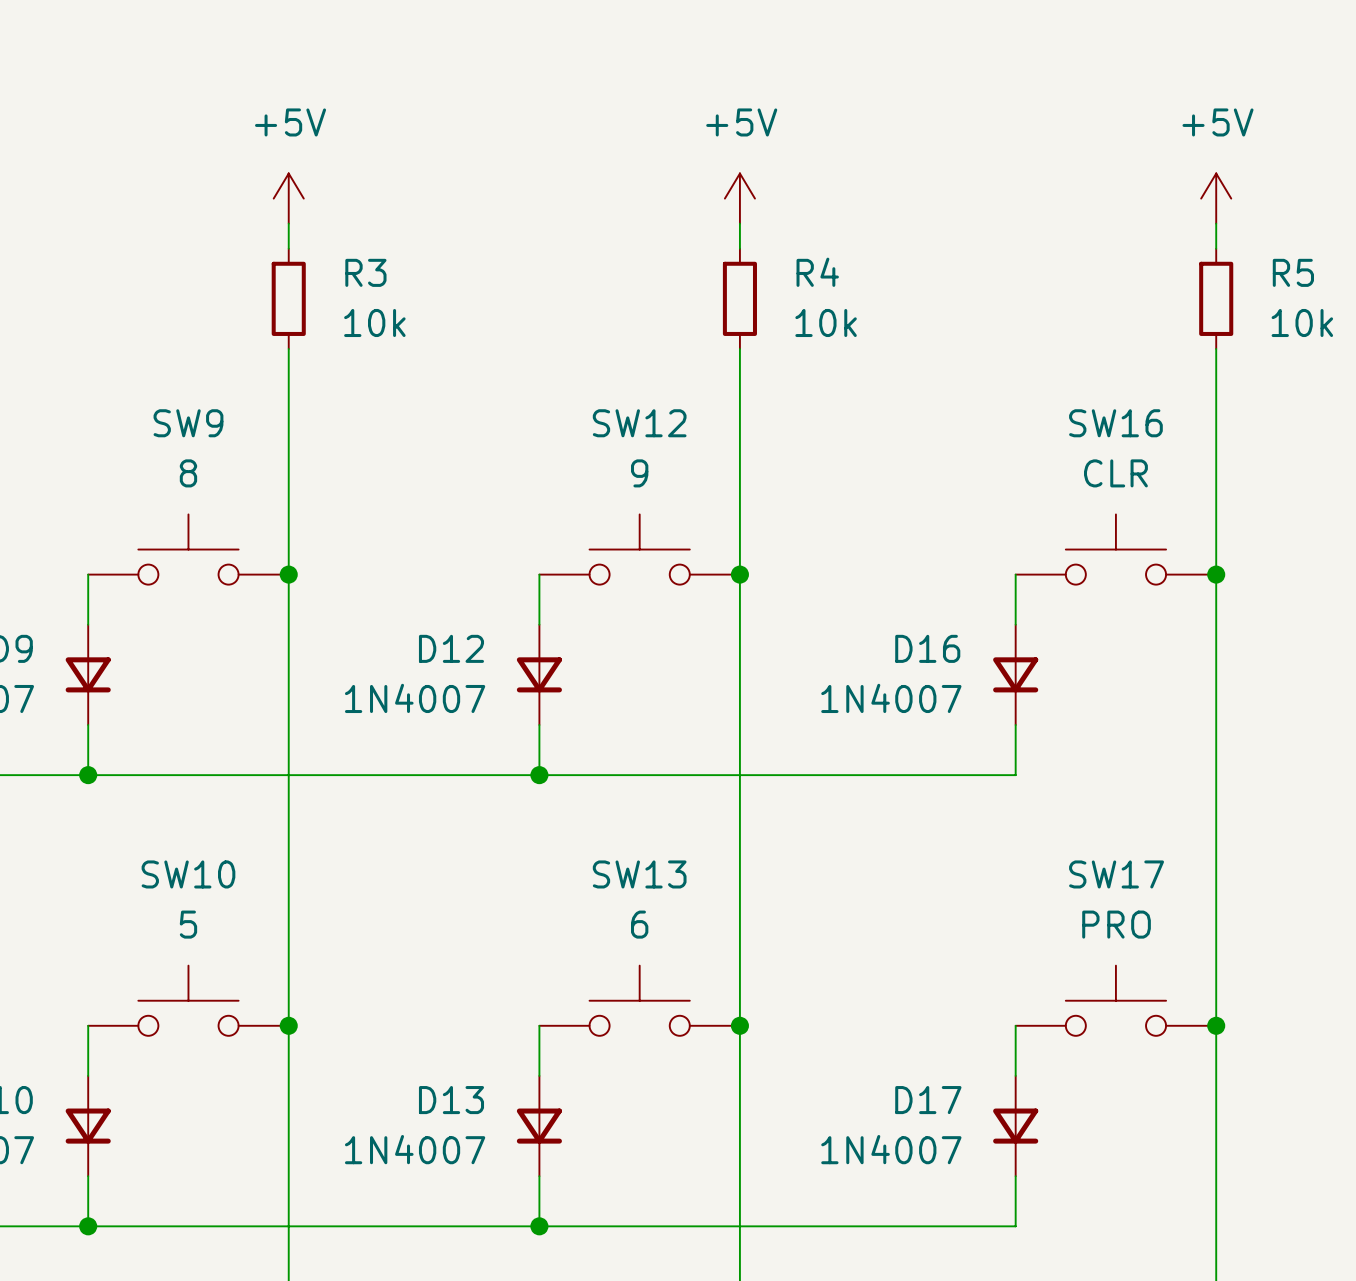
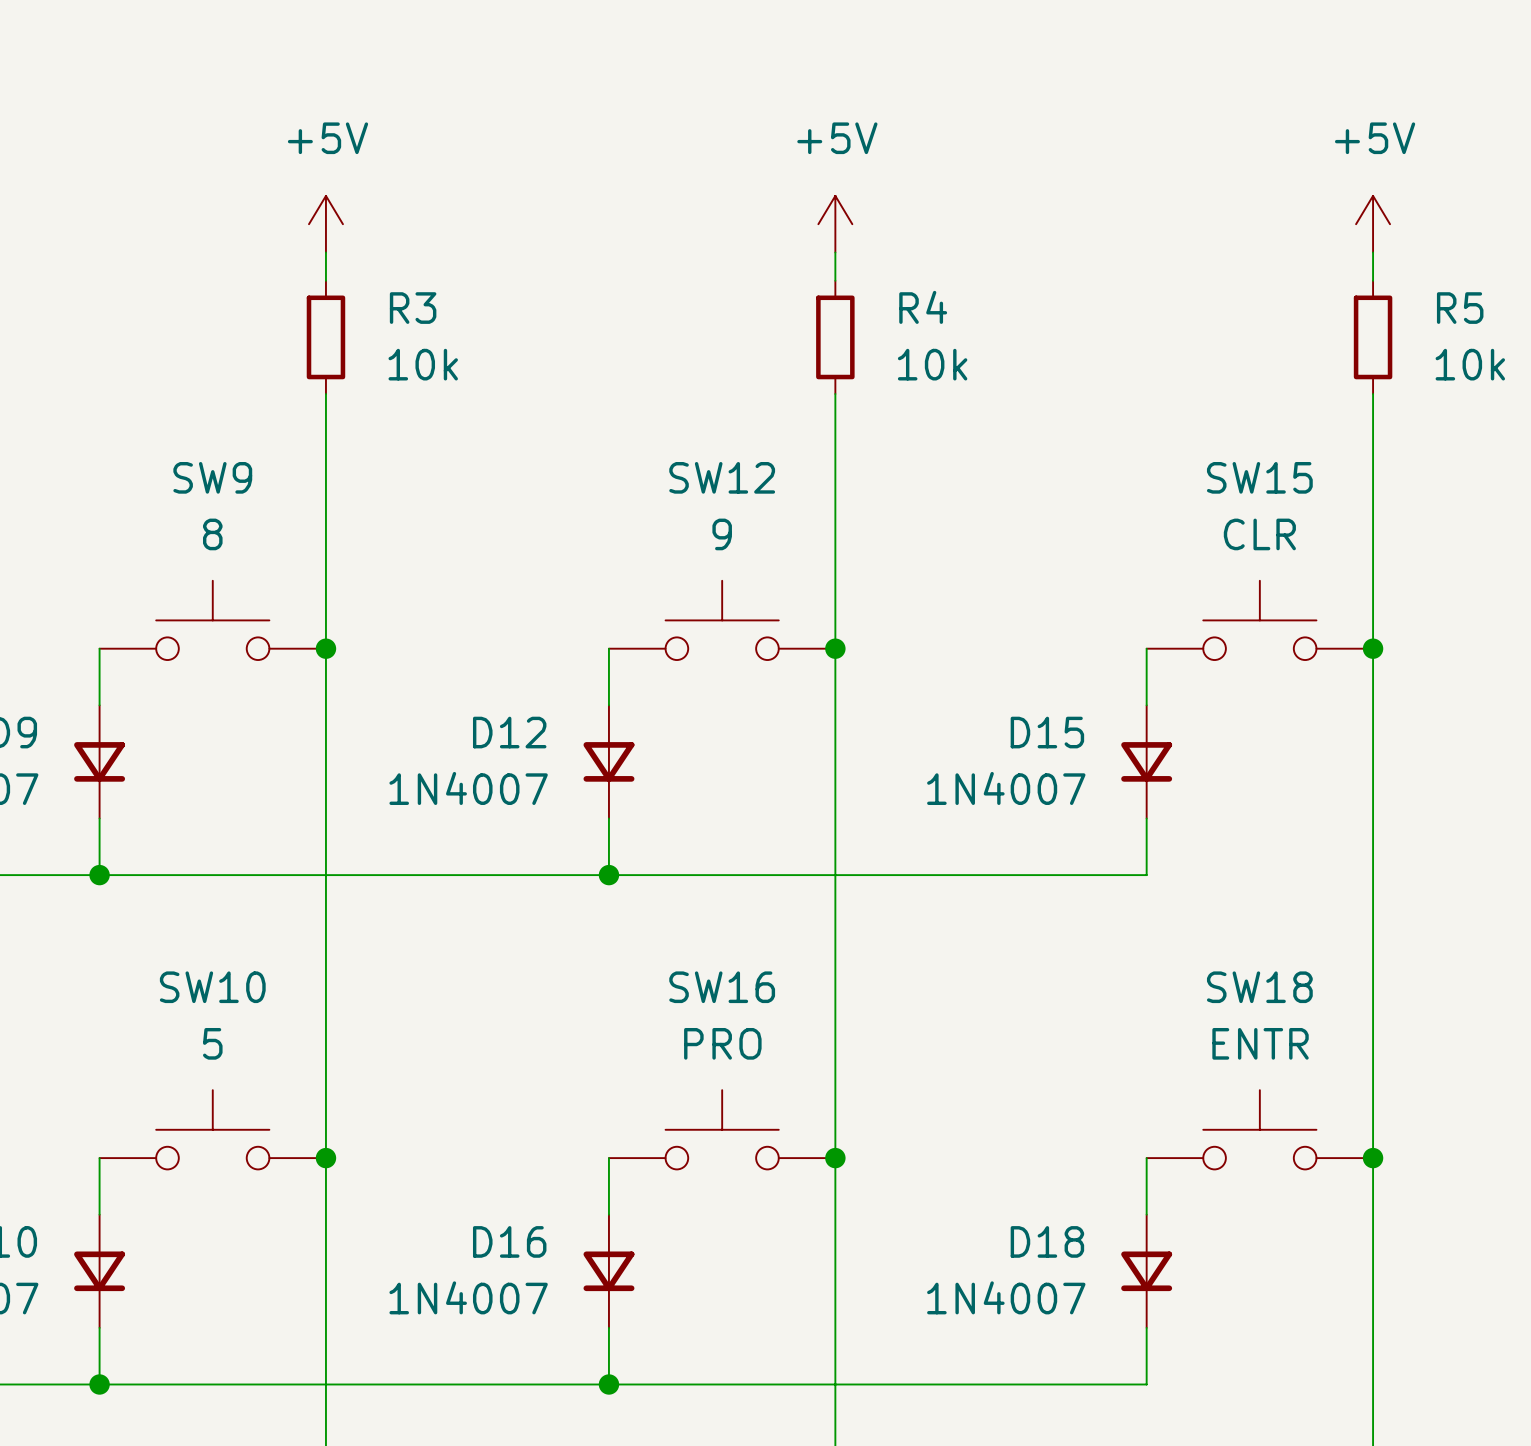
SW16 name: SW16 (1115, 423) -> SW15 (1259, 477)
D16 name: D16 (927, 648) -> D15 (1047, 732)
SW13 name: SW13 (639, 874) -> SW16 (722, 987)
SW17 name: SW17 (1116, 874) -> SW18 (1259, 987)
SW13 value: 6 (639, 924) -> PRO (722, 1043)
SW17 value: PRO (1116, 924) -> ENTR (1260, 1043)
D13 name: D13 (451, 1100) -> D16 (509, 1241)
D17 name: D17 (928, 1100) -> D18 (1047, 1241)

